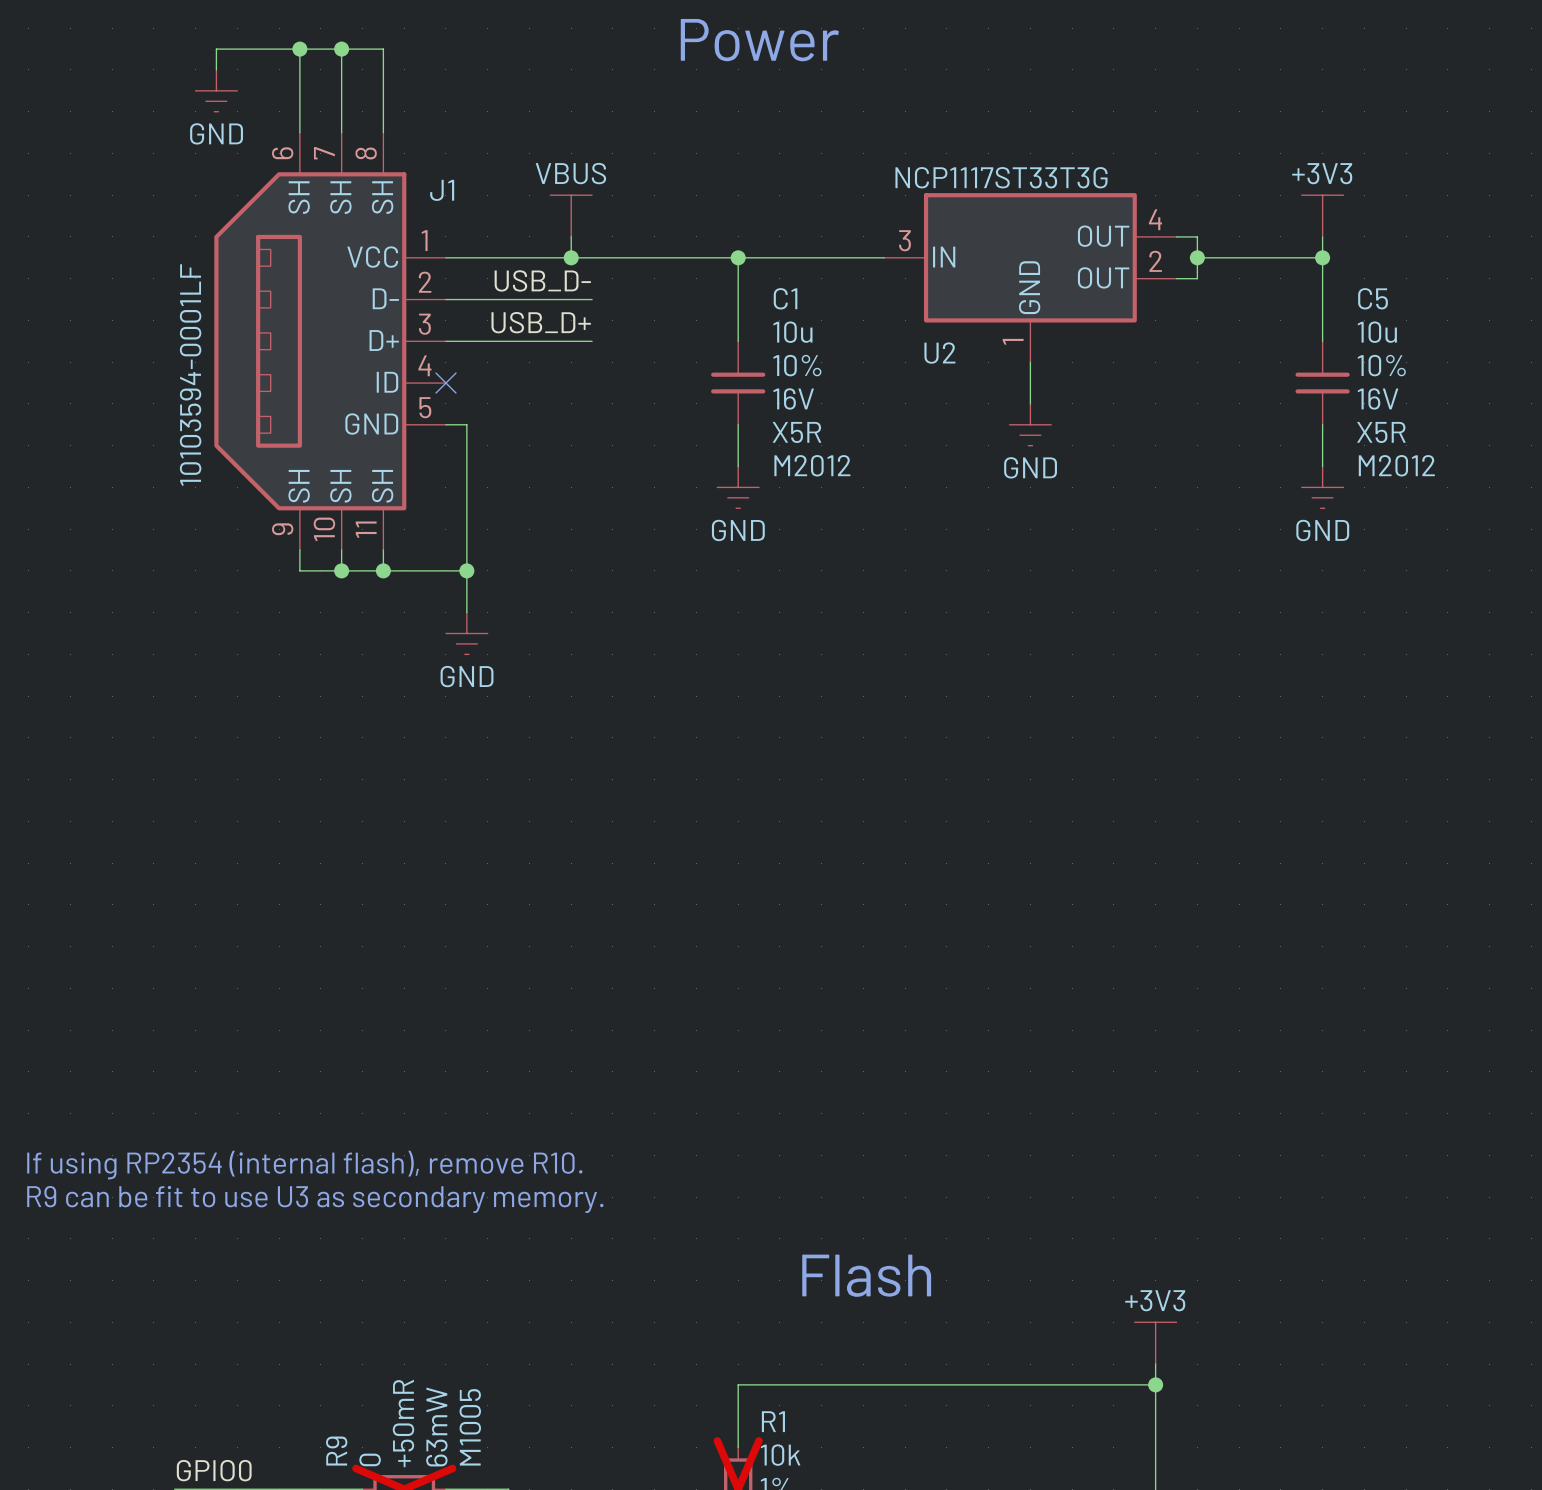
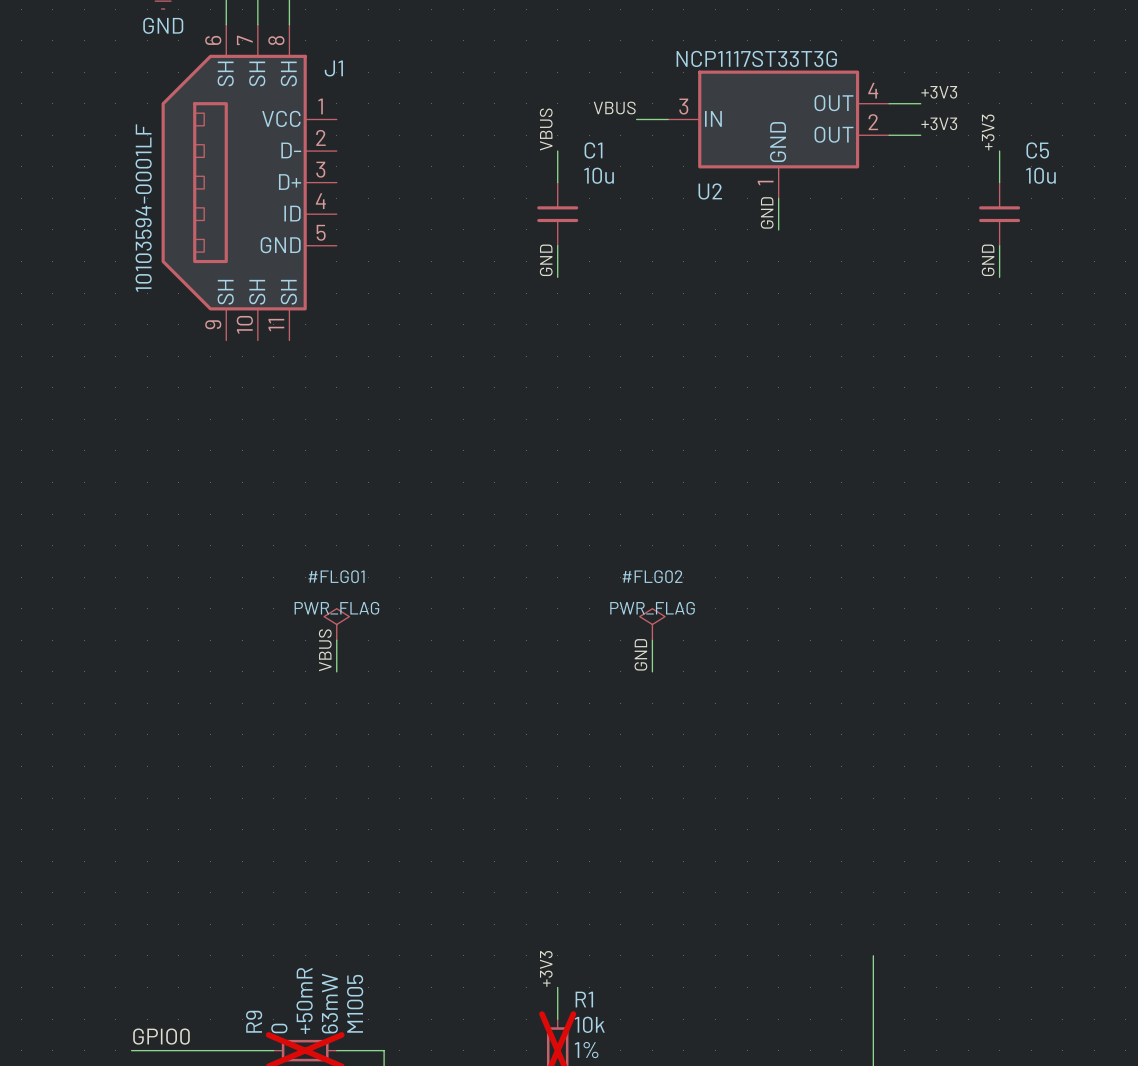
power symbol: VBUS (571, 216) -> none
power symbol: +3V3 (1322, 216) -> none
label: none -> +3V3 (939, 92)
wire: (571, 236) (571, 257) -> none
wire: (1197, 236) (1197, 278) -> (904, 103) (920, 103)
wire: (1322, 236) (1322, 299) -> none
label: none -> VBUS (614, 107)
wire: (445, 257) (842, 257) -> none
junction: (571, 257) -> none
wire: (738, 257) (738, 299) -> none
junction: (738, 257) -> none
wire: (1197, 257) (1322, 257) -> none
junction: (1197, 257) -> none
junction: (1322, 257) -> none
label: none -> +3V3 (939, 123)
label: none -> VBUS (546, 129)
label: none -> +3V3 (988, 132)
wire: none -> (904, 135) (920, 135)
label: USB_D- (542, 280) -> none
wire: (445, 299) (592, 299) -> none
label: USB_D+ (541, 322) -> none
wire: (445, 341) (592, 341) -> none
C1 text: 10% (797, 365) -> none
C5 text: 10% (1381, 365) -> none
label: none -> GND (767, 212)
no-connect mark: (445, 383) -> none
C1 text: 16V (793, 398) -> none
C5 text: 16V (1378, 398) -> none
wire: (445, 424) (466, 424) (466, 612) -> none
power symbol: GND (1030, 424) -> none
C1 text: X5R (796, 432) -> none
C5 text: X5R (1381, 432) -> none
label: none -> GND (546, 260)
label: none -> GND (988, 260)
C1 text: M2012 (812, 465) -> none
C5 text: M2012 (1396, 465) -> none
power symbol: GND (738, 487) -> none
power symbol: GND (1322, 487) -> none
wire: (299, 550) (299, 570) (466, 570) -> none
wire: (341, 550) (341, 570) -> none
wire: (383, 550) (383, 570) -> none
junction: (341, 570) -> none
junction: (383, 570) -> none
junction: (466, 570) -> none
power symbol: GND (466, 633) -> none
#FLG01: none -> PWR_FLAG (336, 624)
#FLG02: none -> PWR_FLAG (652, 624)
wire: none -> (336, 640) (336, 671)
wire: none -> (652, 640) (652, 671)
label: none -> VBUS (325, 650)
label: none -> GND (640, 654)
text: If using RP2354 (internal flash), remove R10. (304, 1165) -> none
text: R9 can be fit to use U3 as secondary memory. (315, 1199) -> none
text: Flash (866, 1275) -> none
power symbol: +3V3 (1155, 1343) -> none
label: none -> +3V3 (546, 968)
wire: (1155, 1384) (738, 1384) (738, 1405) -> none
junction: (1155, 1384) -> none

